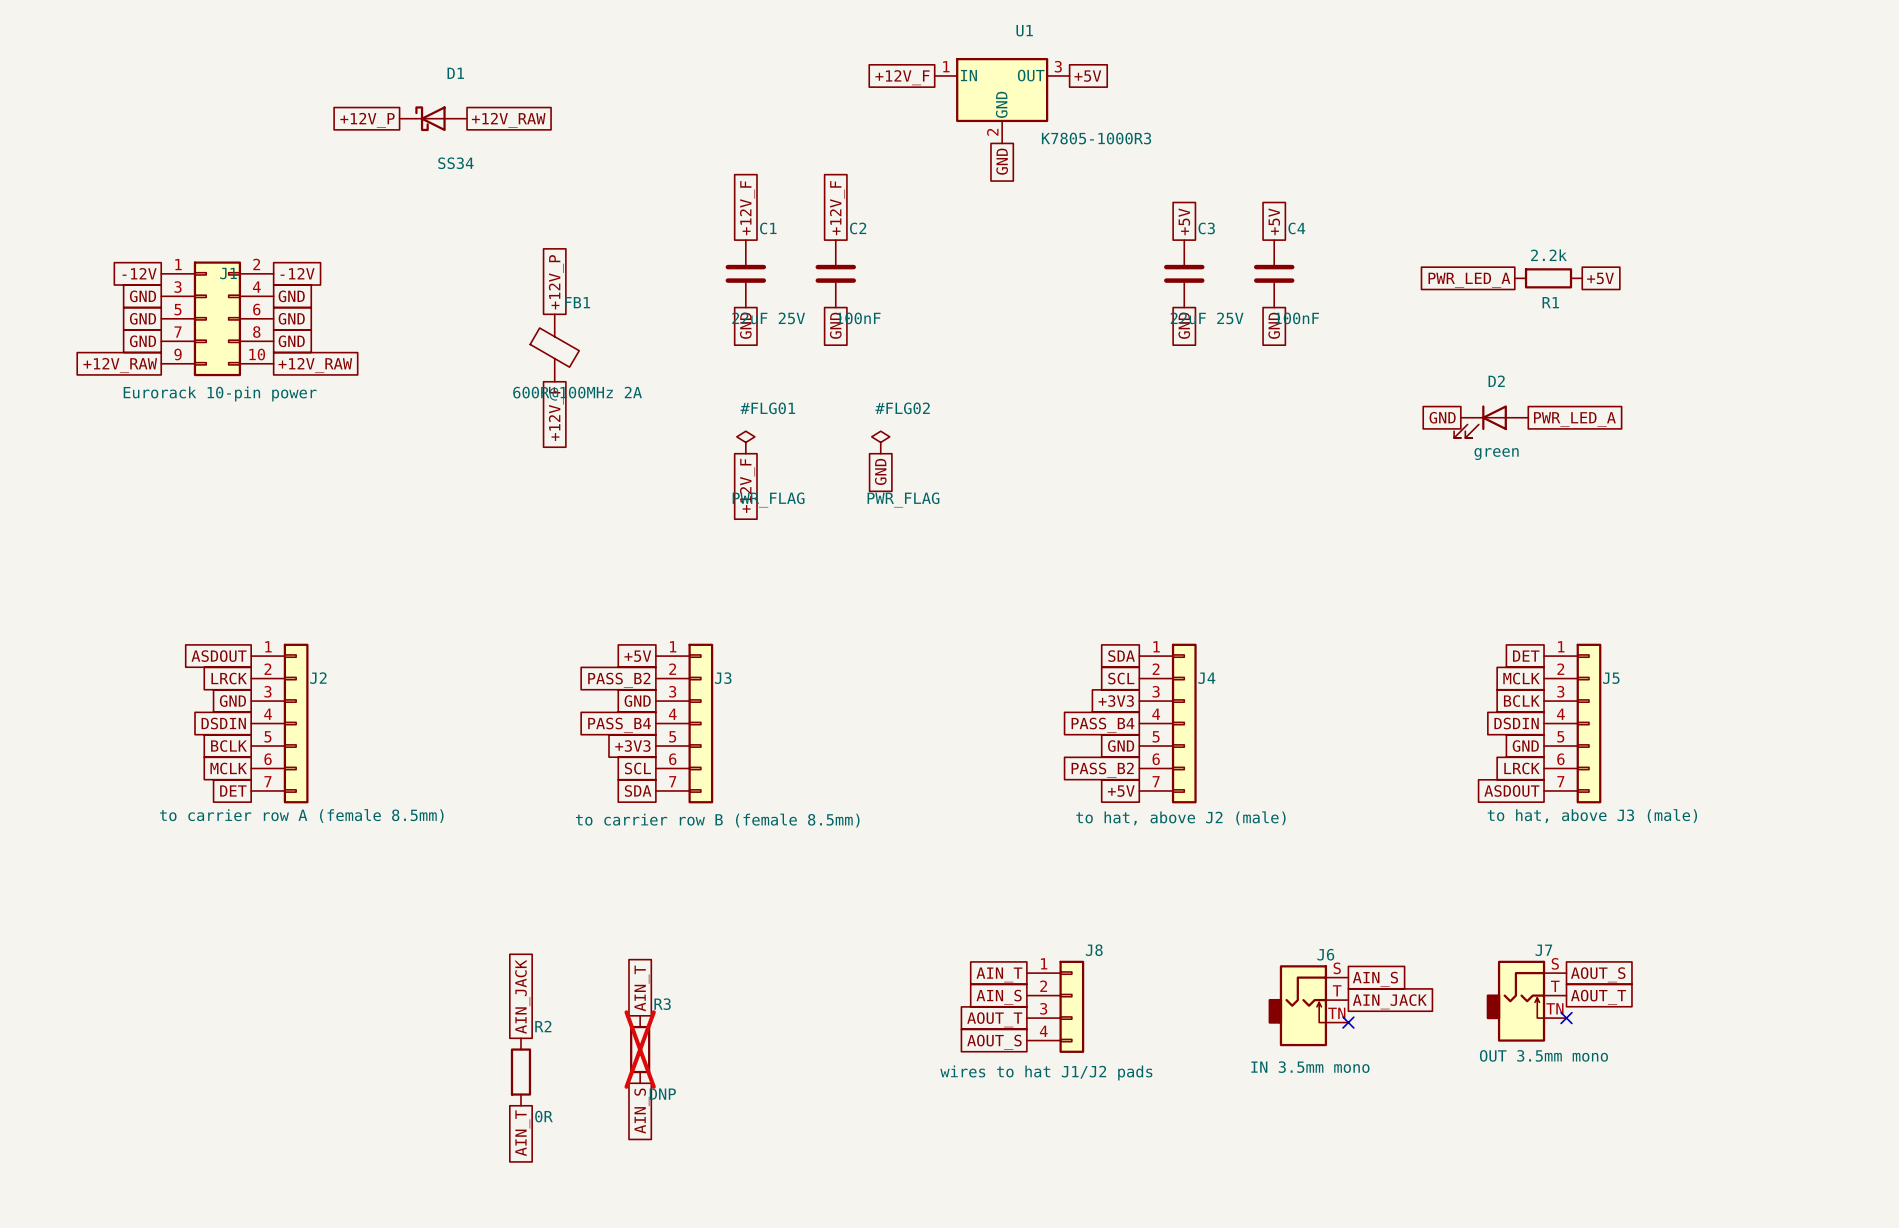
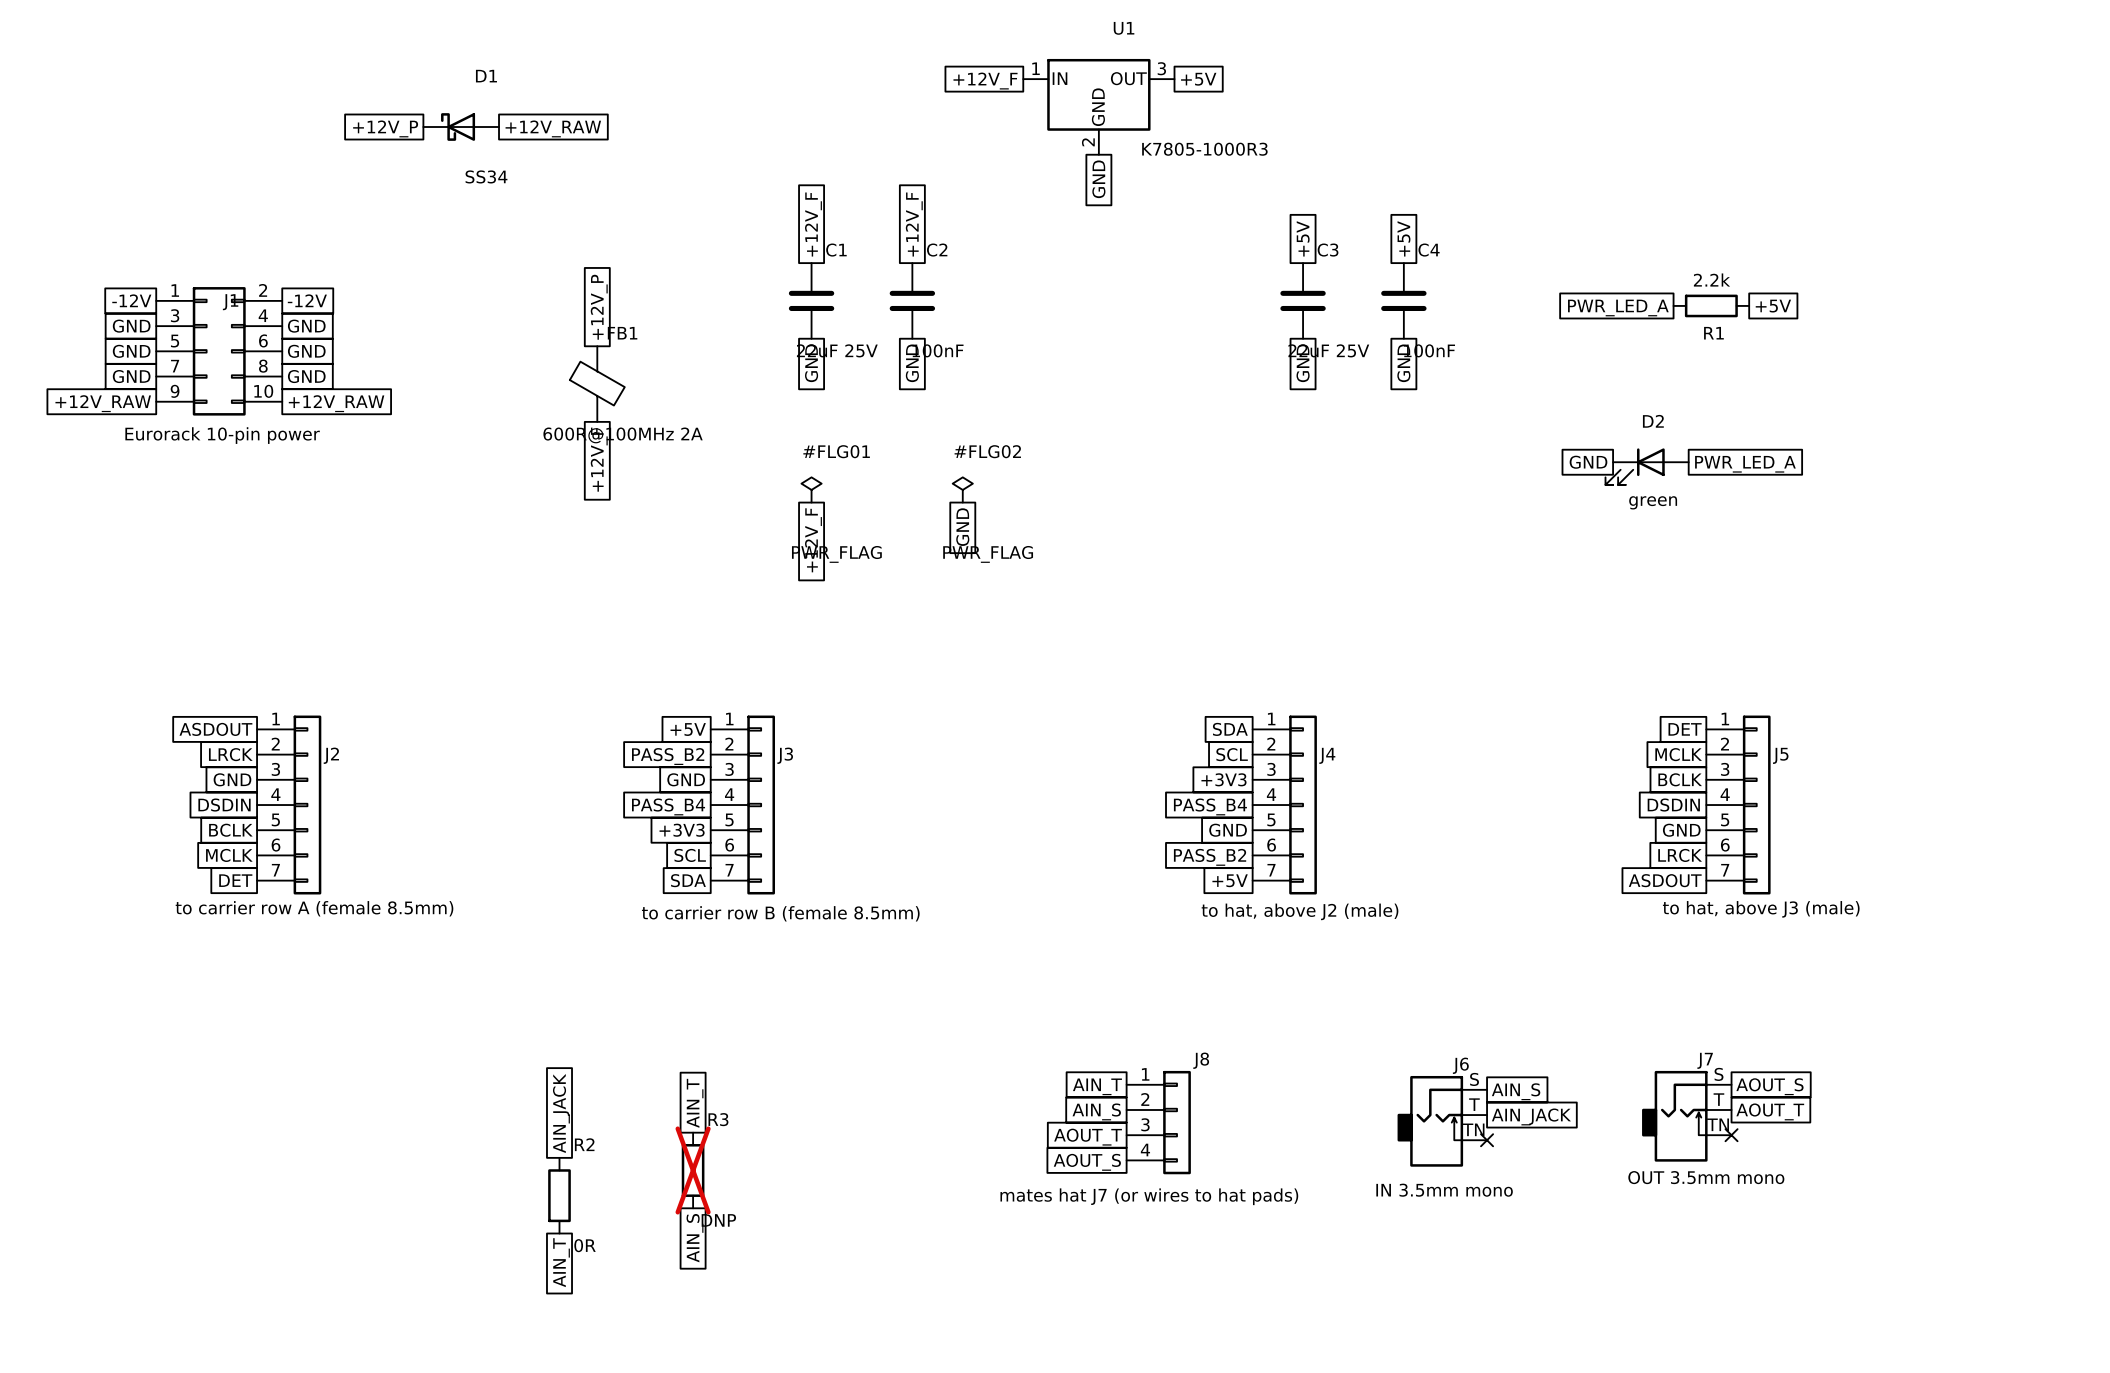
J8 value: wires to hat J1/J2 pads (1046, 1072) -> mates hat J7 (or wires to hat pads) (1149, 1196)

